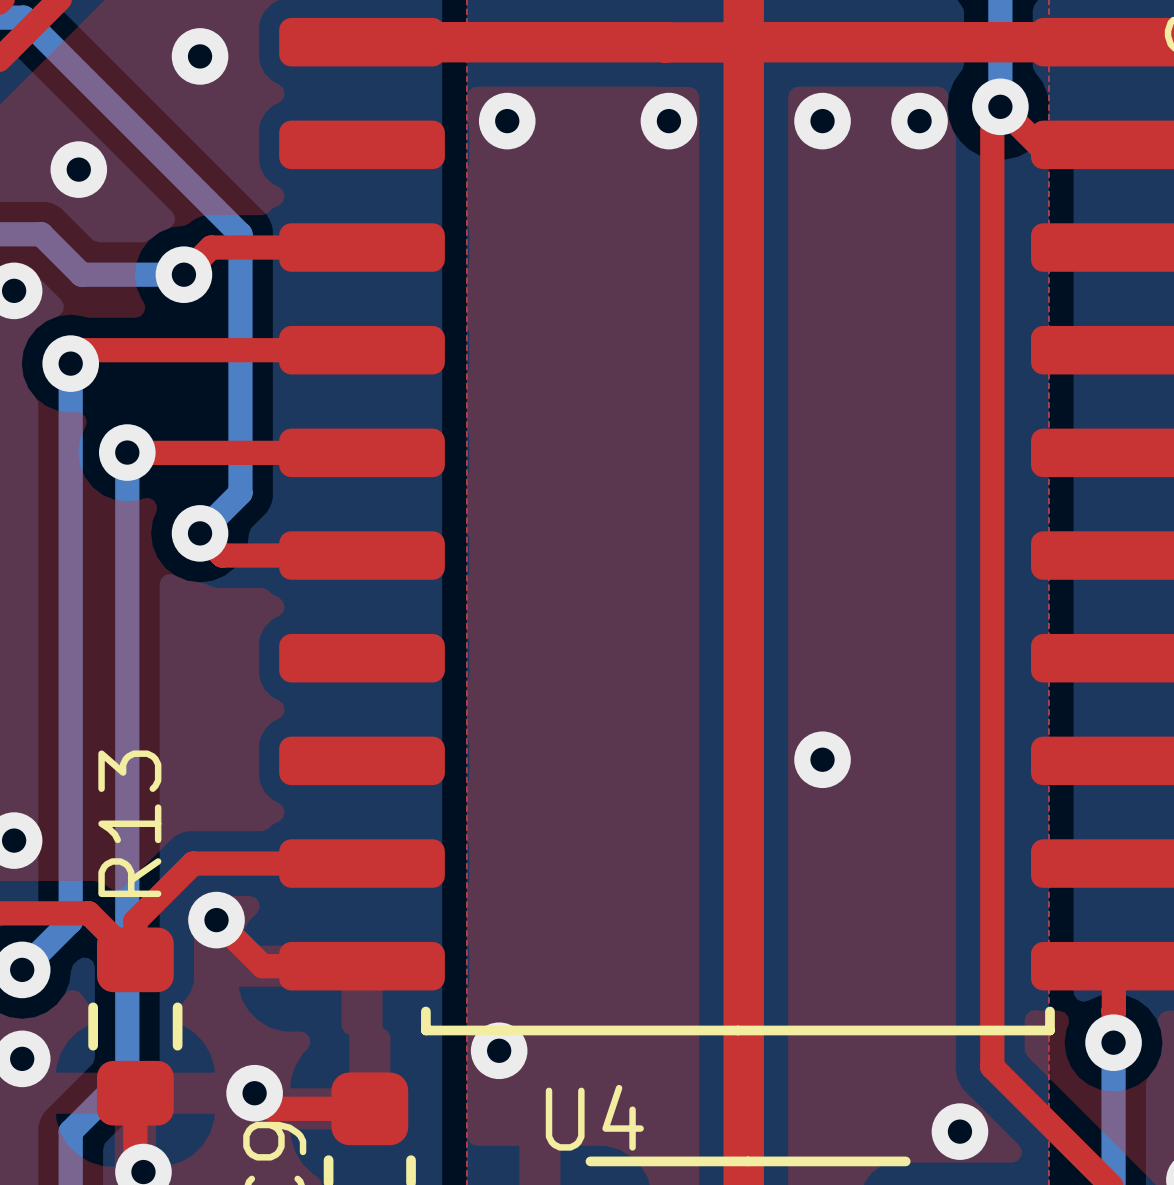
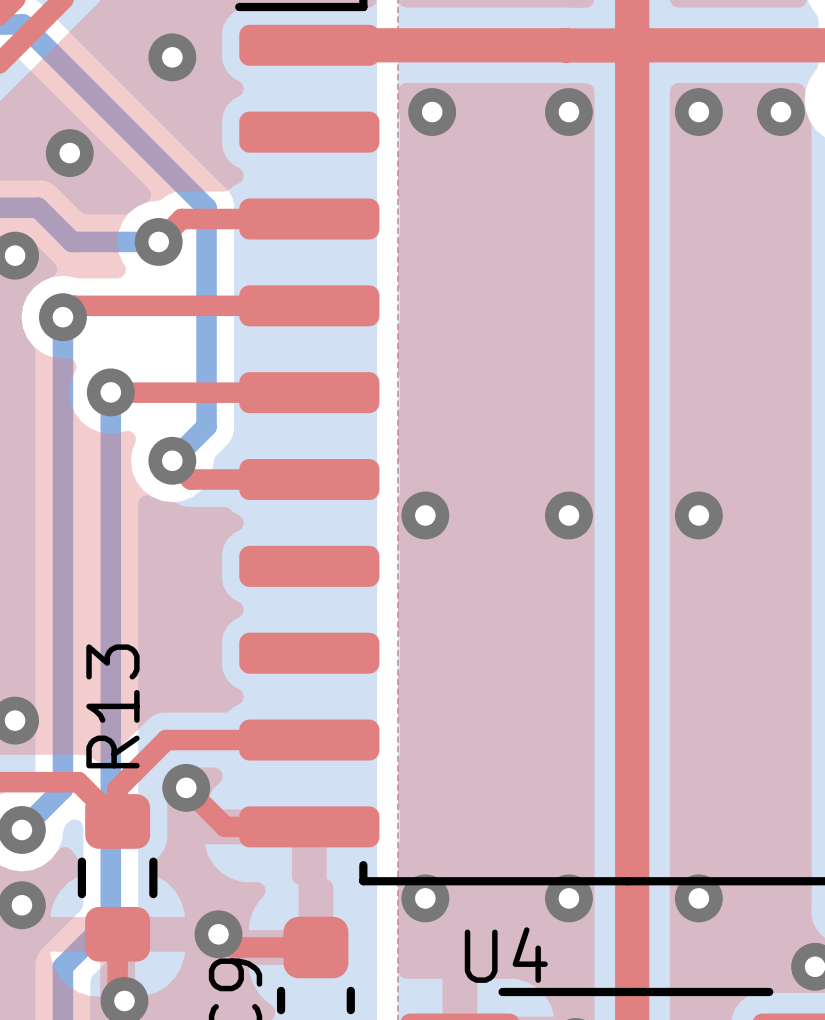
via: none -> (425, 515)
via: none -> (568, 515)
via: none -> (698, 515)
via: (822, 759) -> none
via: none -> (568, 898)
via: none -> (698, 898)

